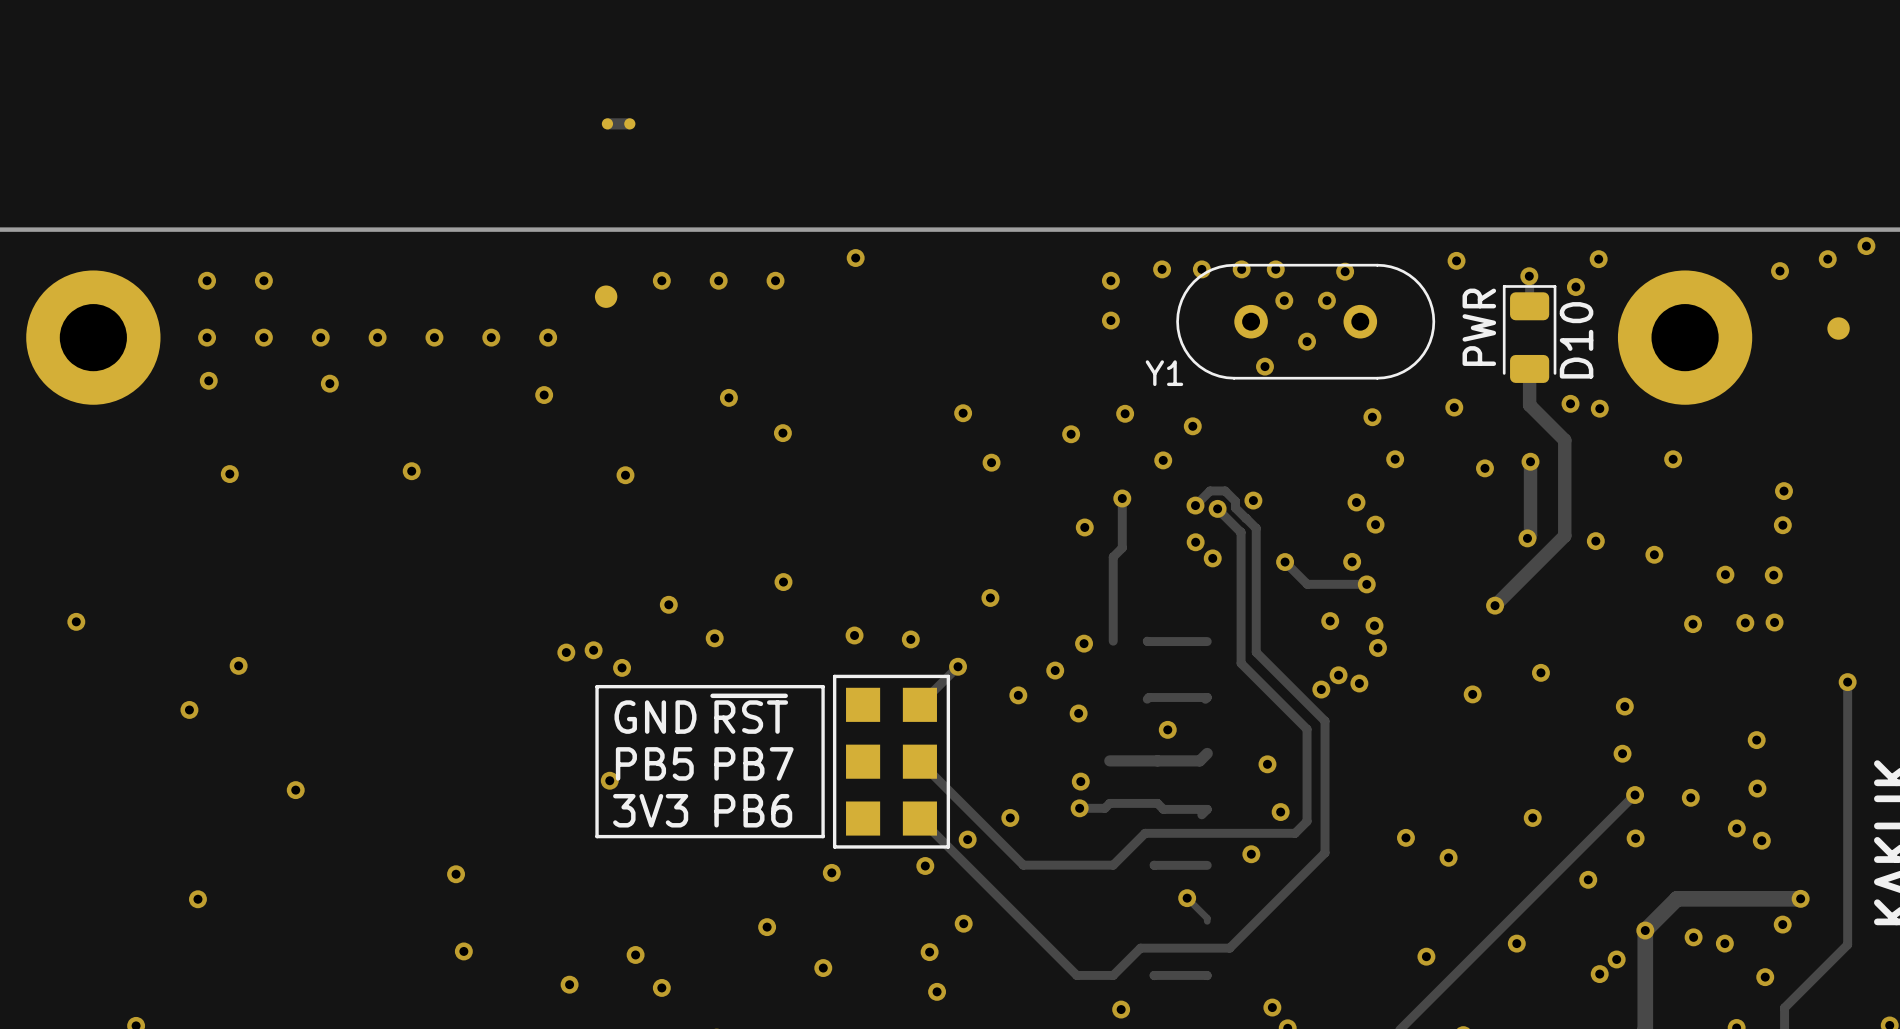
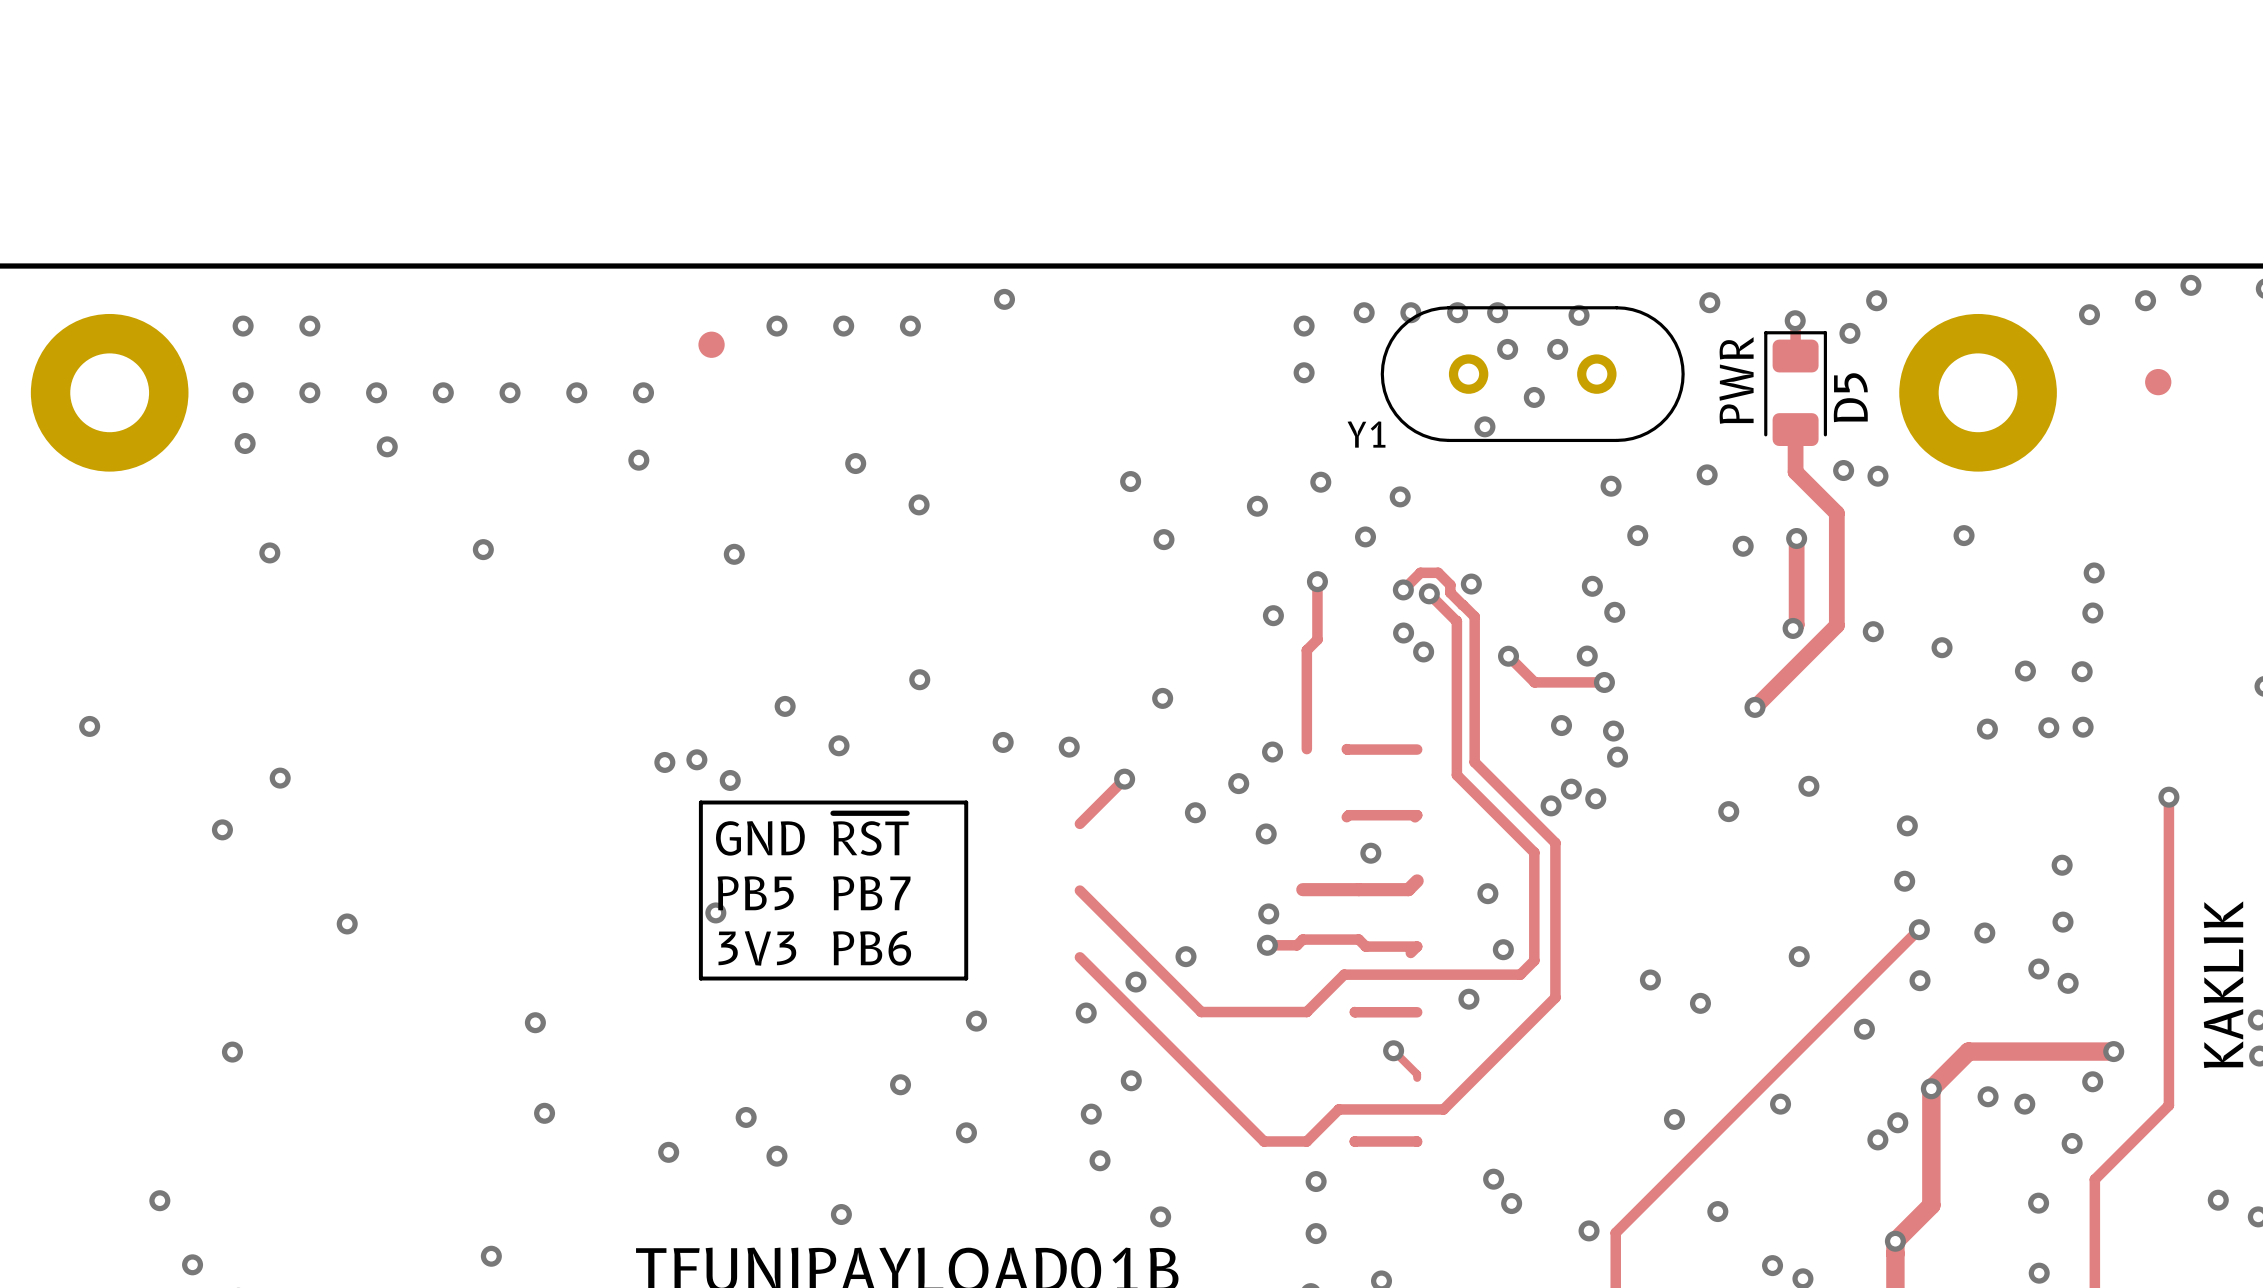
part: (618, 123) -> none
D10 name: D10 (1576, 340) -> D5 (1850, 397)
part: (891, 761) -> none

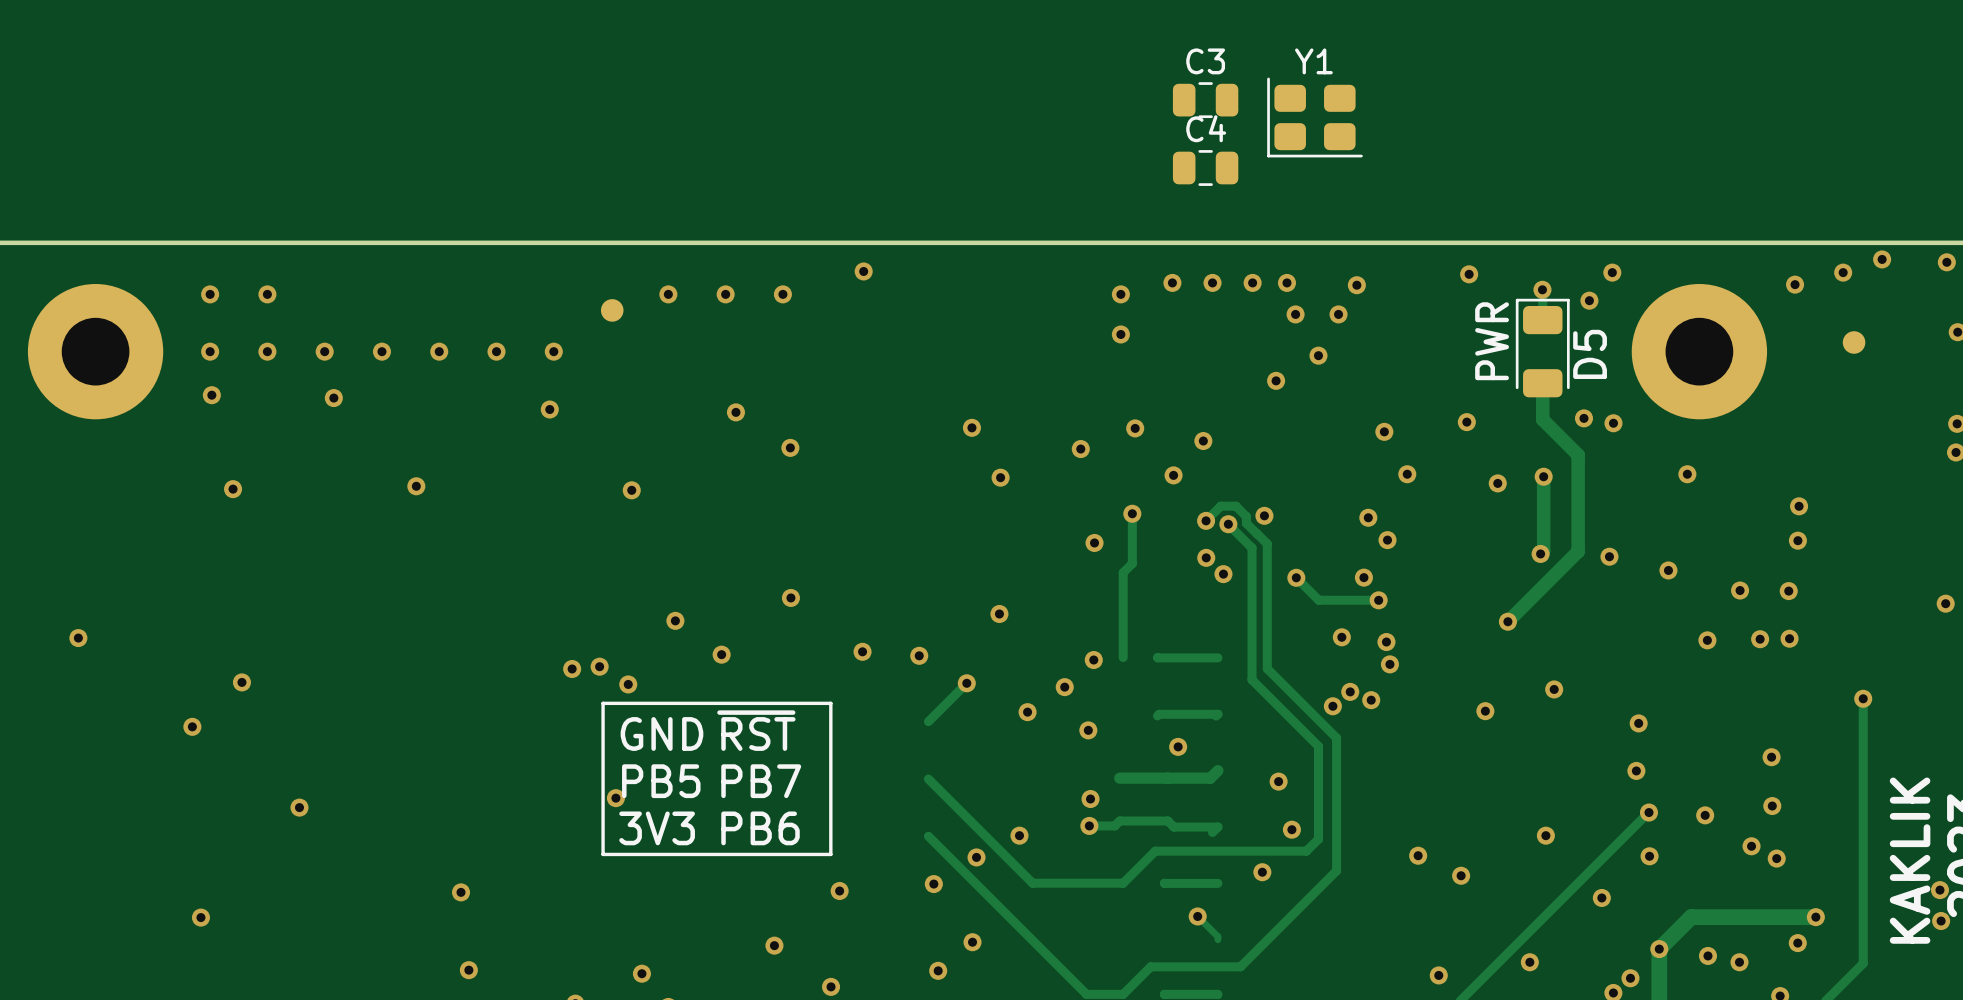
C3: none -> (1205, 100)
C4: none -> (1205, 168)
Y1 footprint: [1380, 306, 1685, 443] -> [1267, 77, 1363, 158]
Y1 name position: Y1 (1366, 434) -> Y1 (1313, 61)

